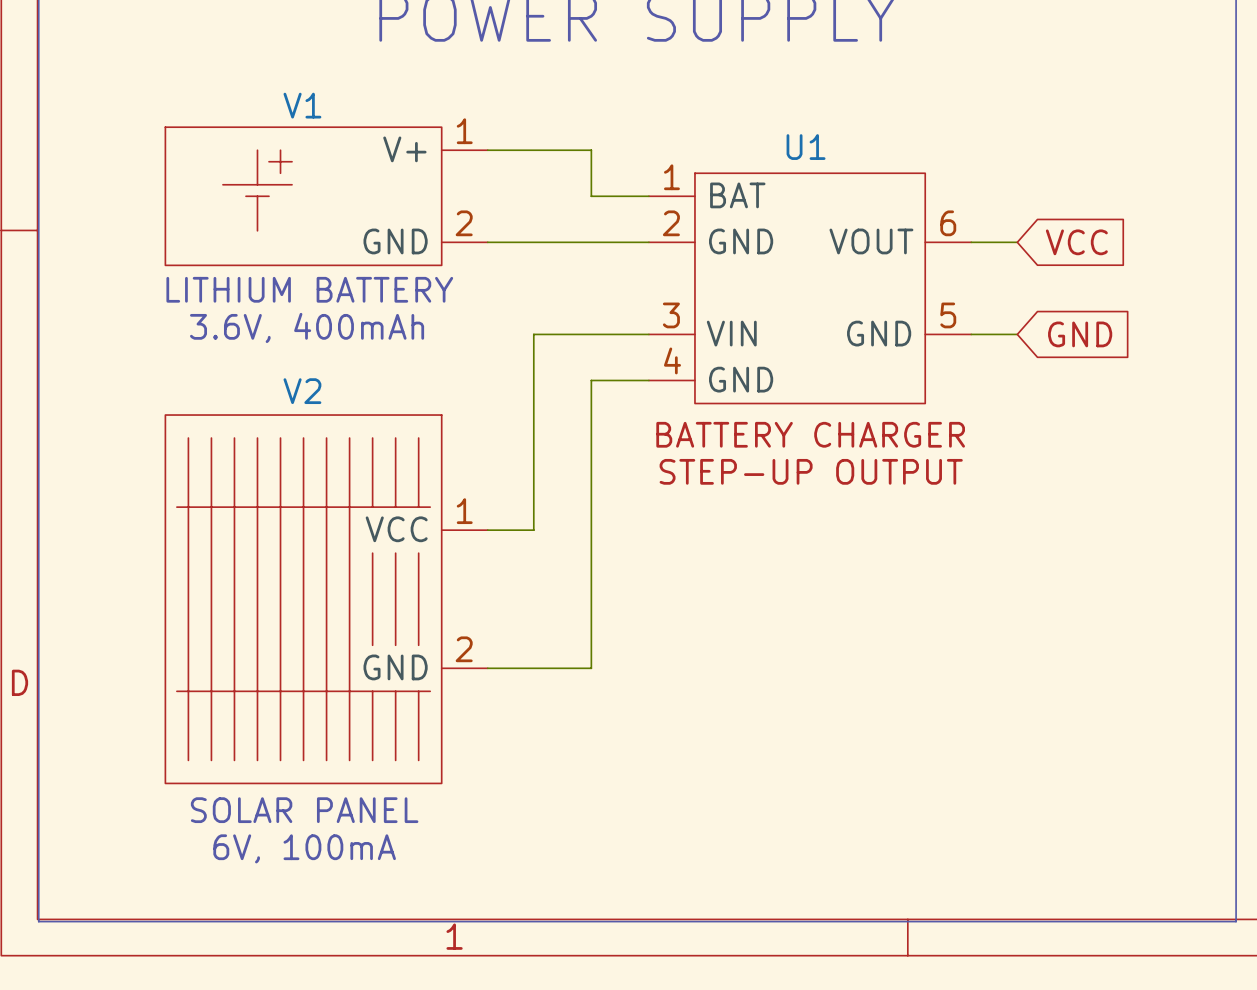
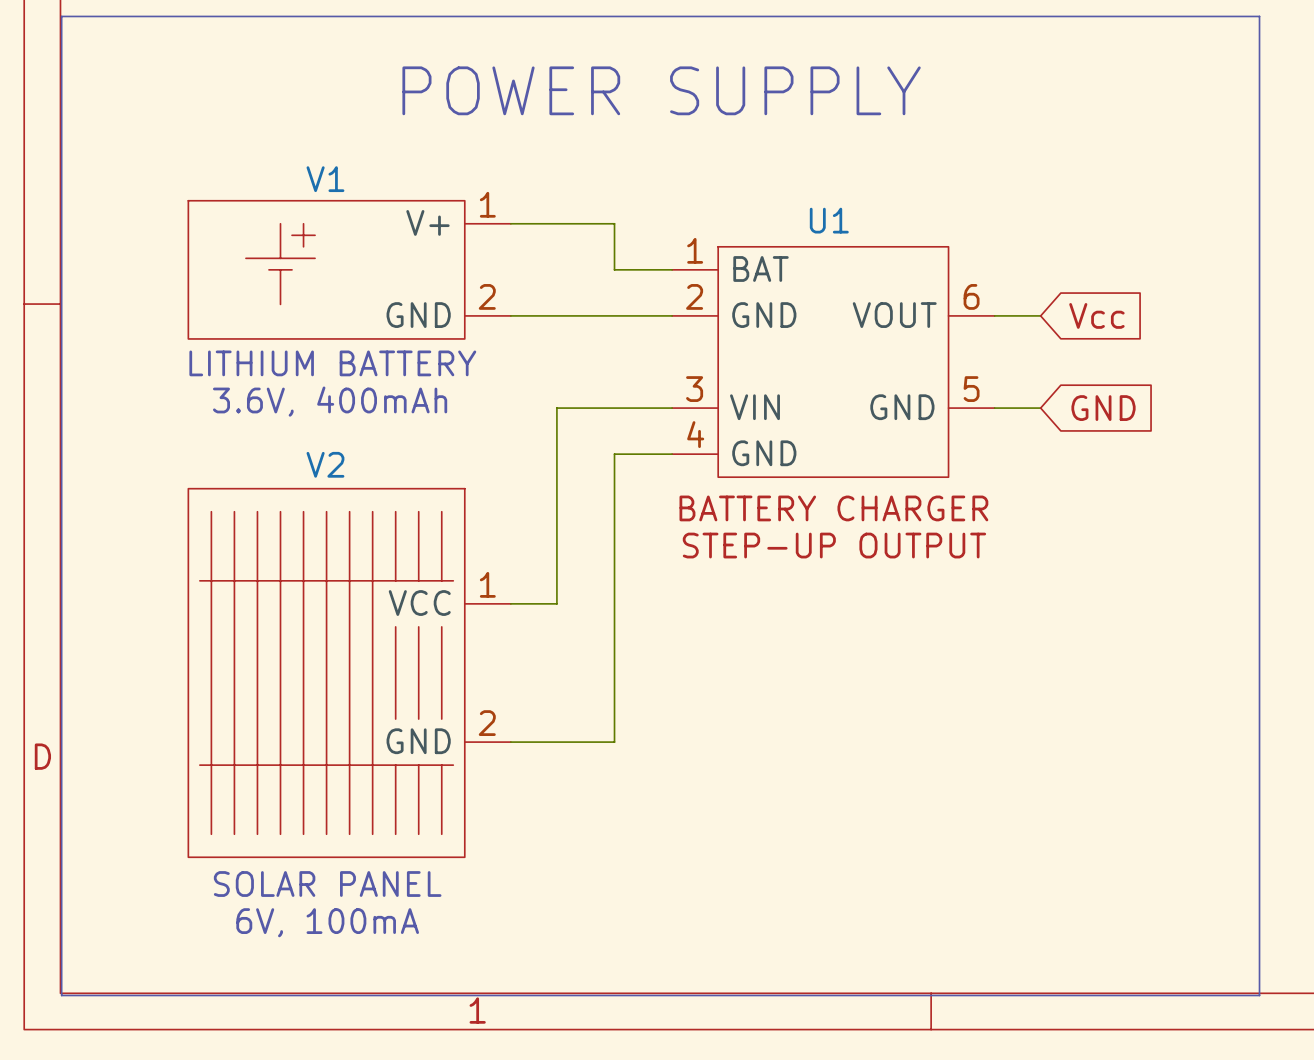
global label: VCC (1076, 242) -> Vcc (1096, 315)

